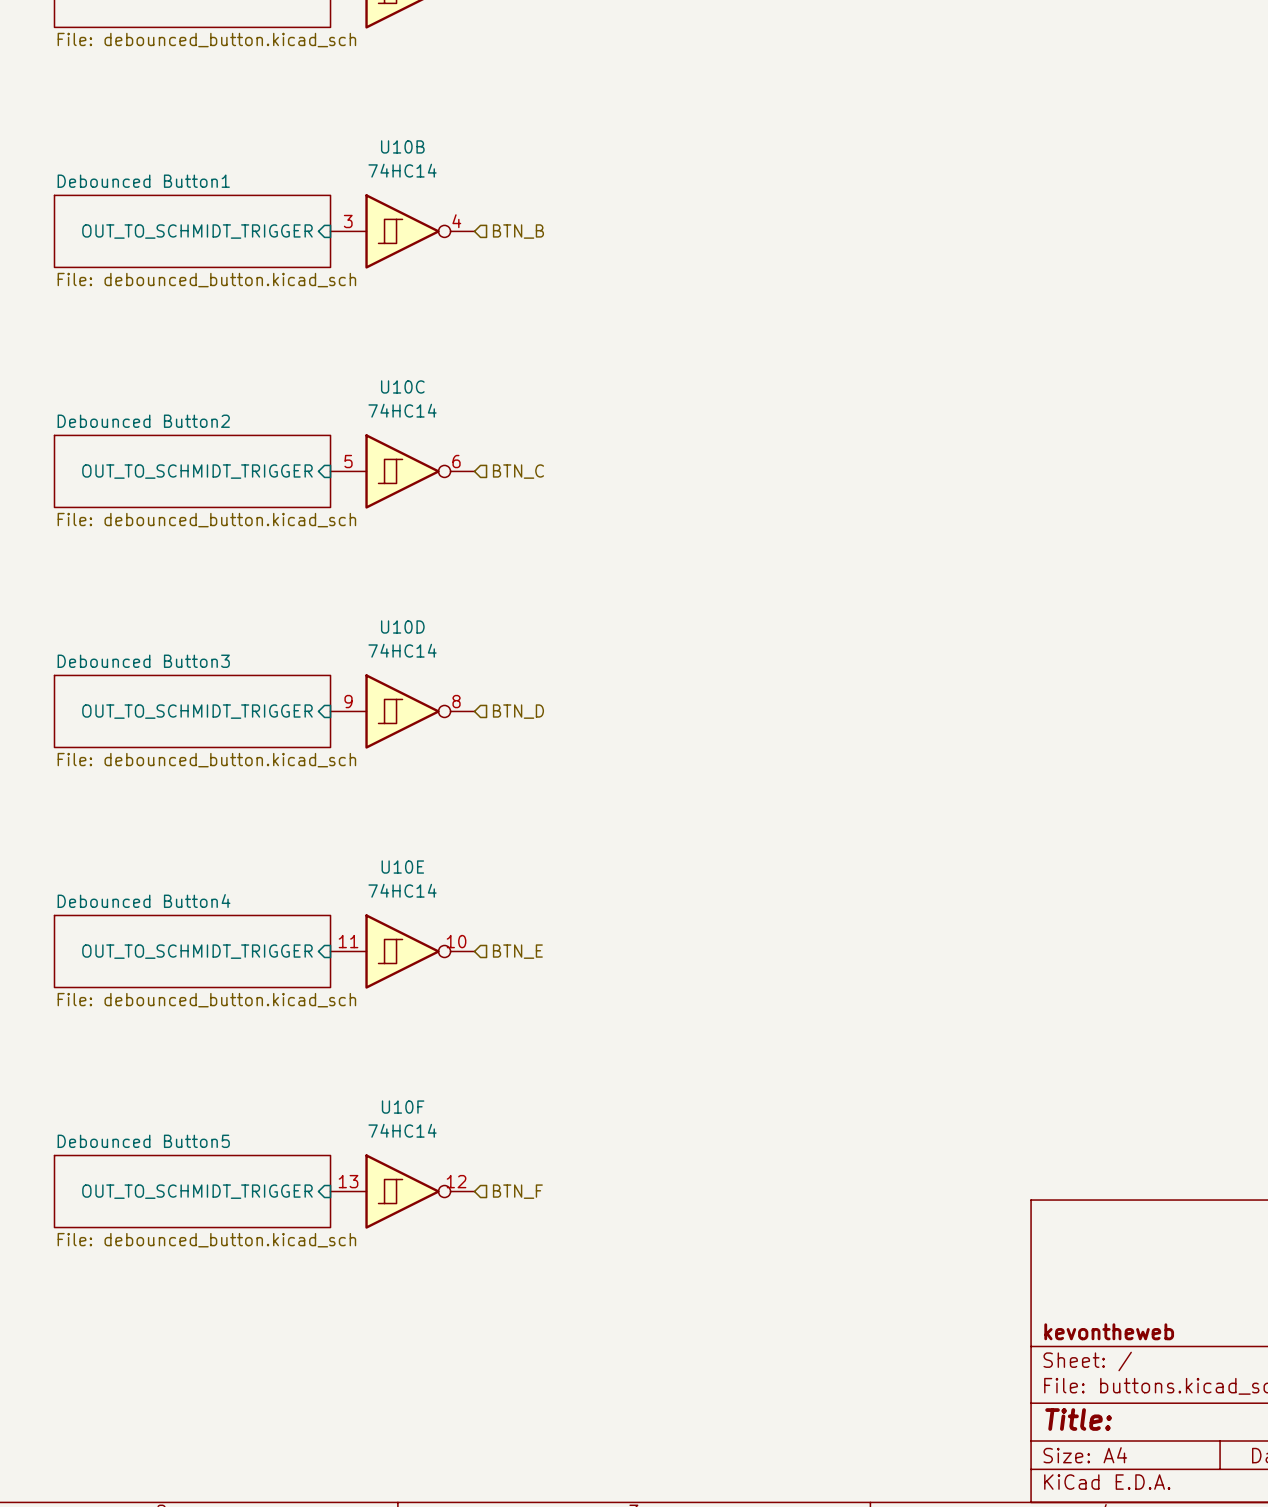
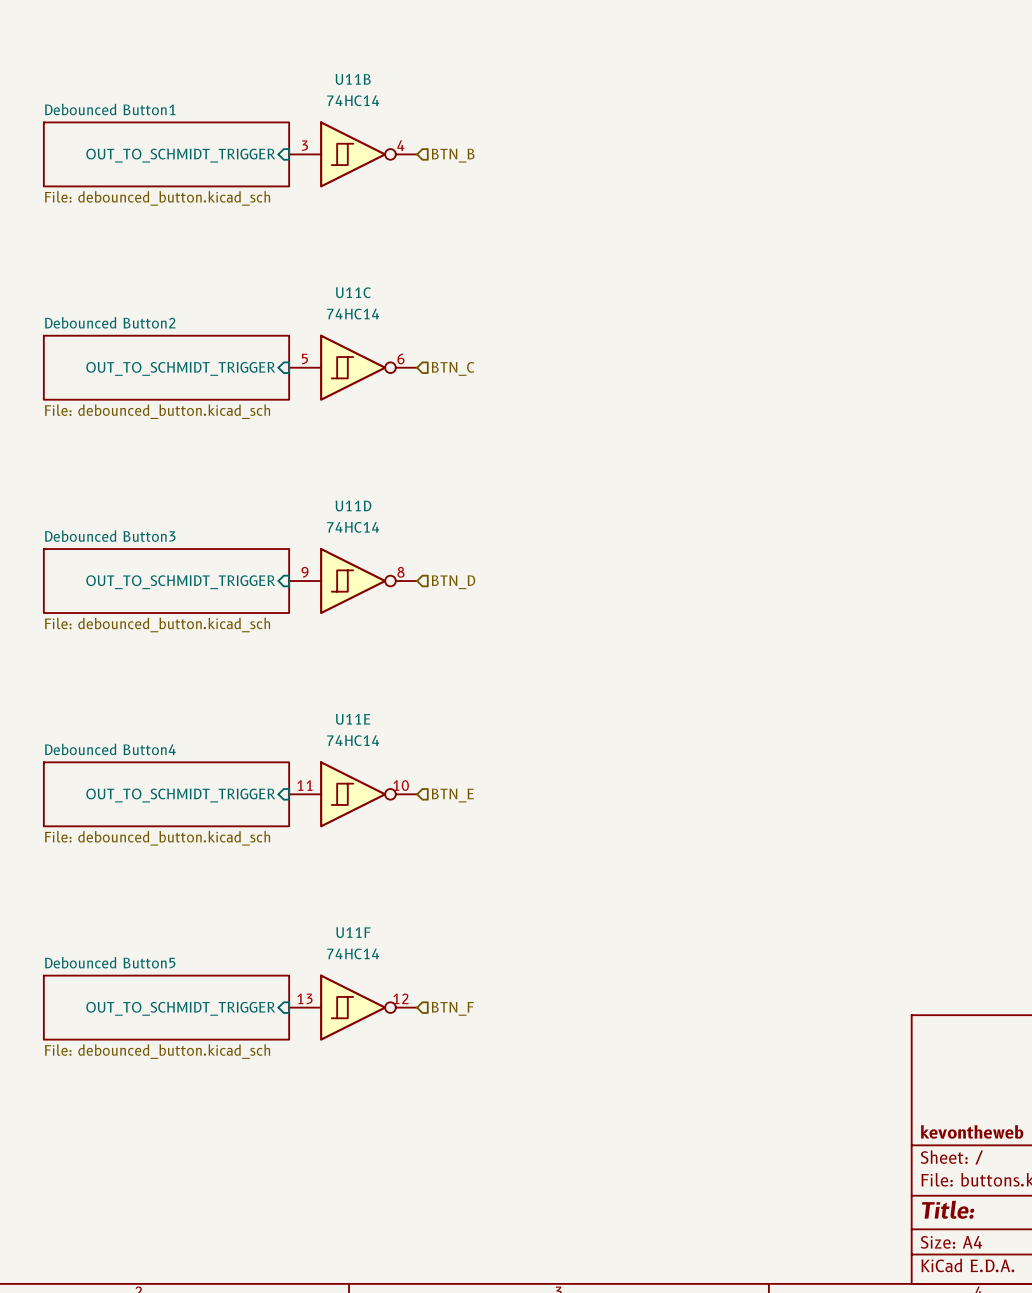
U10B name: U10B (402, 146) -> U11B (353, 79)
U10C name: U10C (402, 386) -> U11C (353, 292)
U10D name: U10D (402, 627) -> U11D (353, 506)
U10E name: U10E (402, 867) -> U11E (353, 719)
U10F name: U10F (403, 1107) -> U11F (353, 932)

